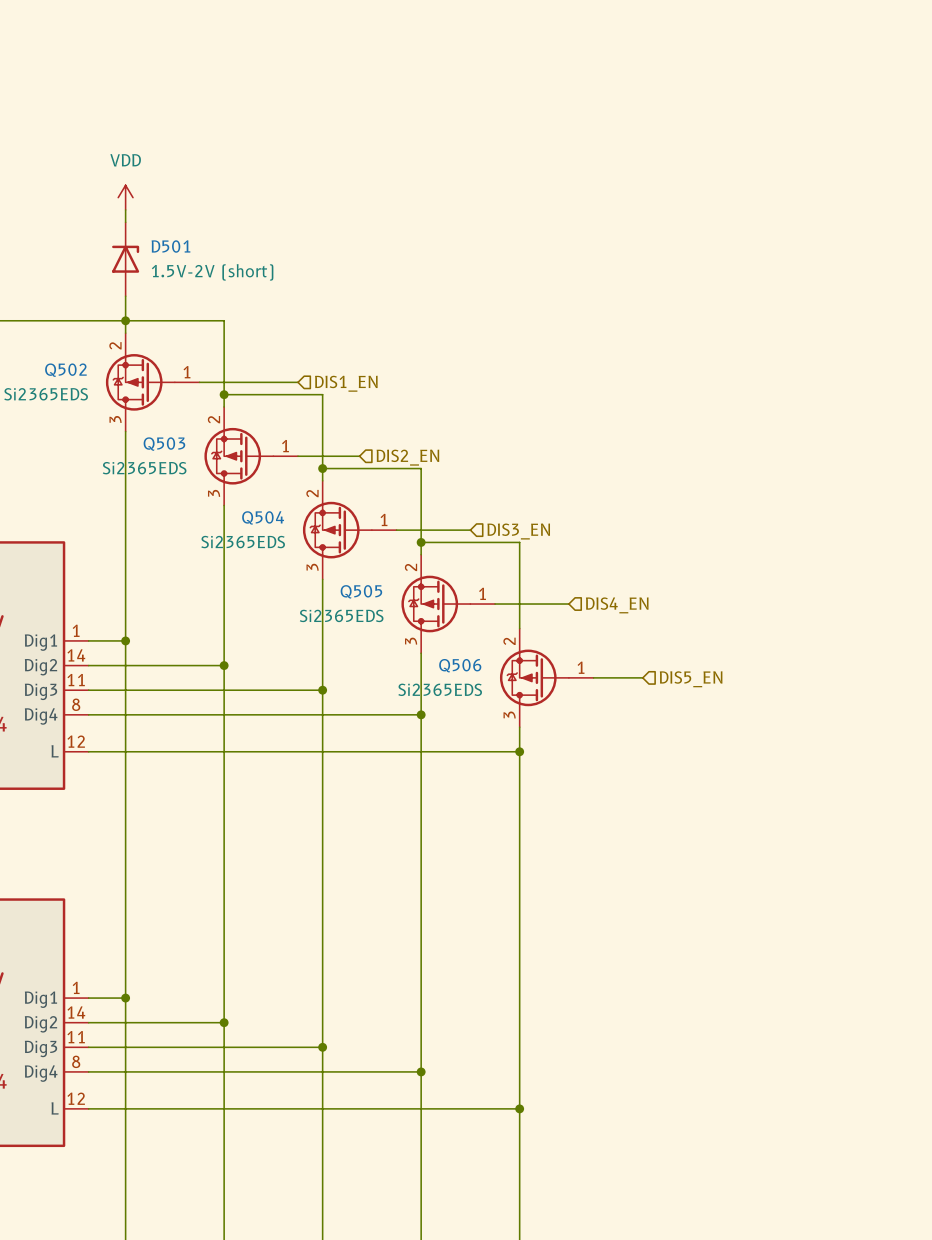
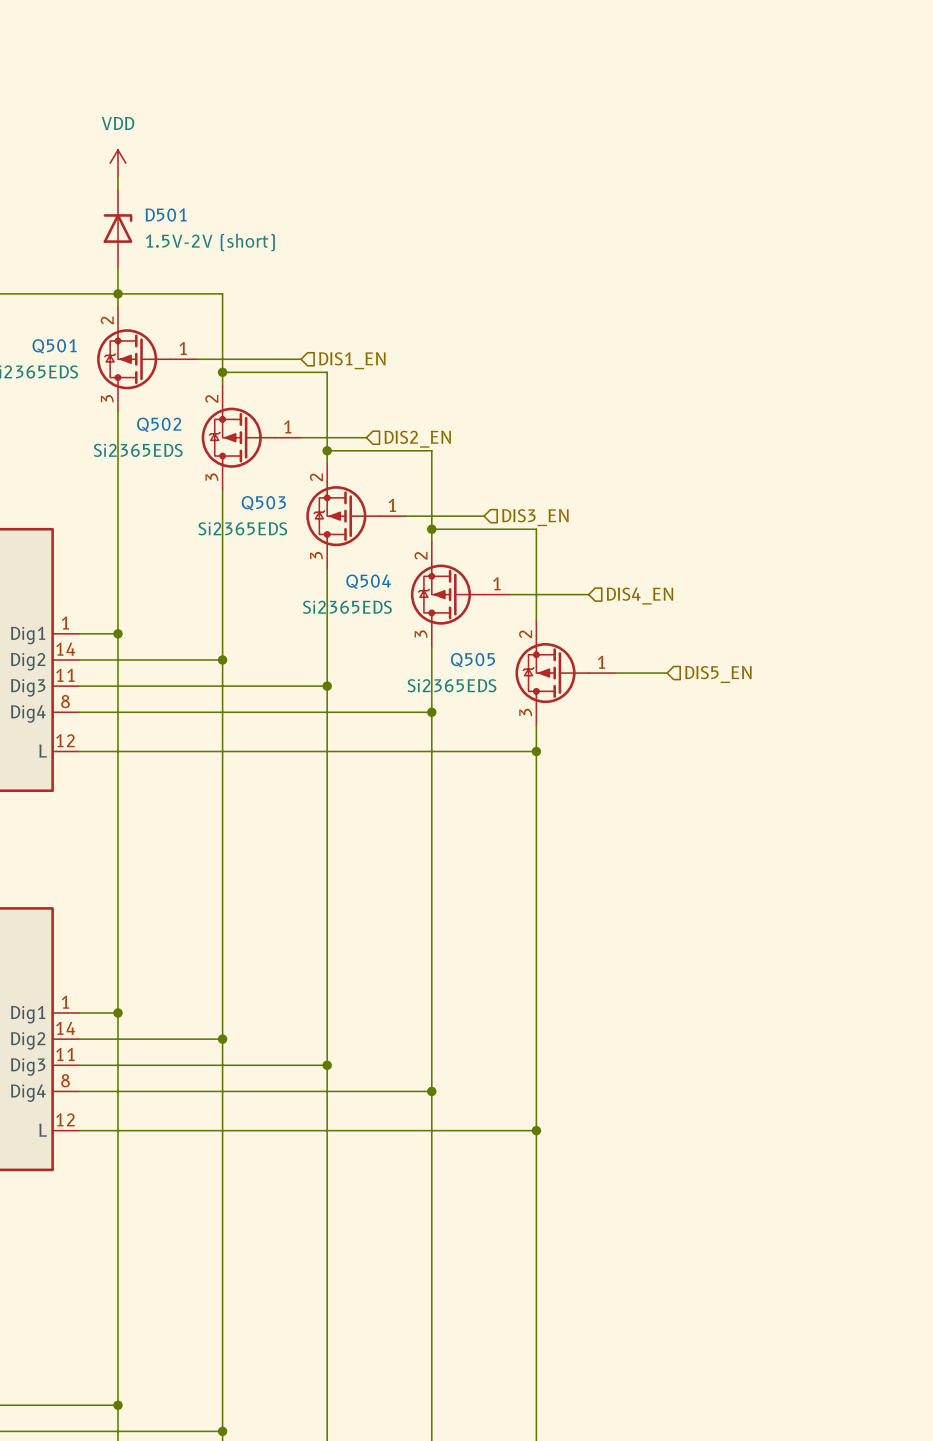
Q502 name: Q502 (65, 370) -> Q501 (54, 346)
Q503 name: Q503 (164, 444) -> Q502 (159, 424)
Q504 name: Q504 (263, 517) -> Q503 (263, 503)
Q505 name: Q505 (361, 591) -> Q504 (368, 581)
Q506 name: Q506 (460, 665) -> Q505 (472, 660)

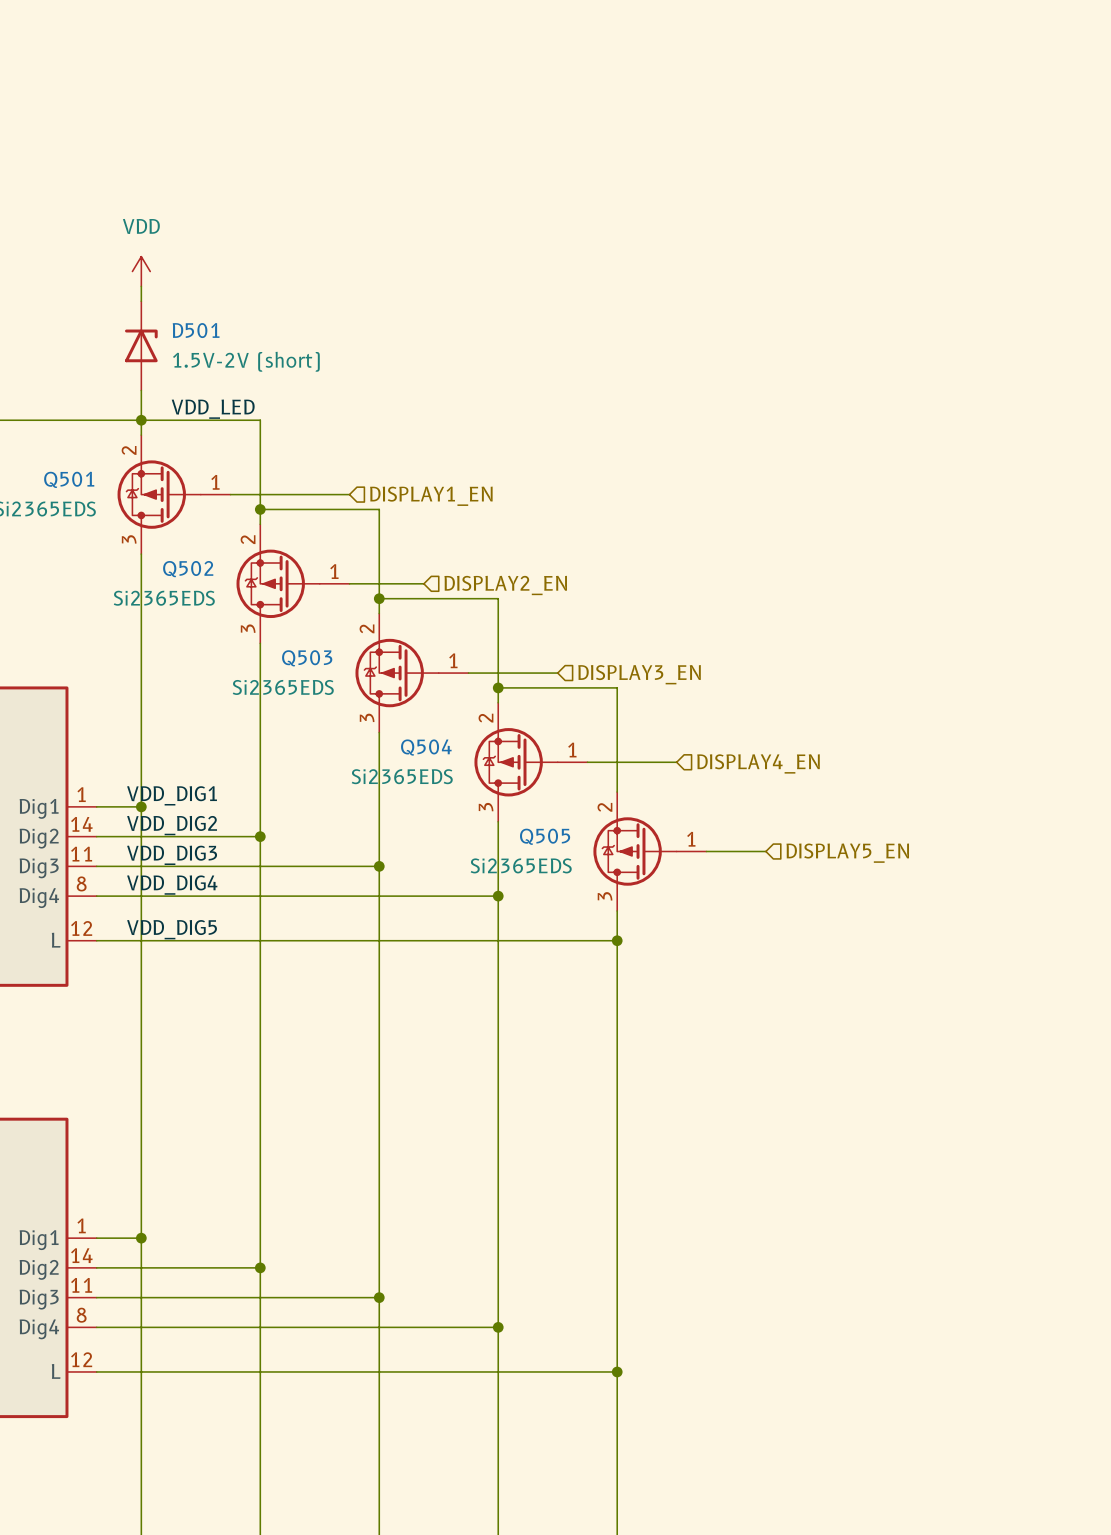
label: none -> VDD_LED (213, 409)
hierarchical label: DIS1_EN (352, 360) -> DISPLAY1_EN (431, 496)
hierarchical label: DIS2_EN (417, 439) -> DISPLAY2_EN (505, 585)
hierarchical label: DIS3_EN (535, 517) -> DISPLAY3_EN (639, 674)
hierarchical label: DIS4_EN (639, 596) -> DISPLAY4_EN (758, 763)
label: none -> VDD_DIG1 (172, 795)
label: none -> VDD_DIG2 (172, 825)
hierarchical label: DIS5_EN (718, 674) -> DISPLAY5_EN (847, 853)
label: none -> VDD_DIG3 (172, 855)
label: none -> VDD_DIG4 (172, 885)
label: none -> VDD_DIG5 (172, 929)

